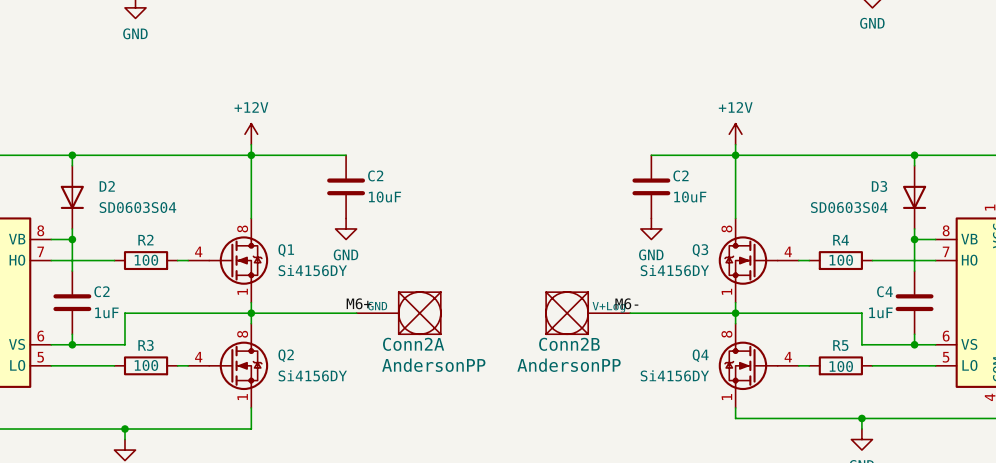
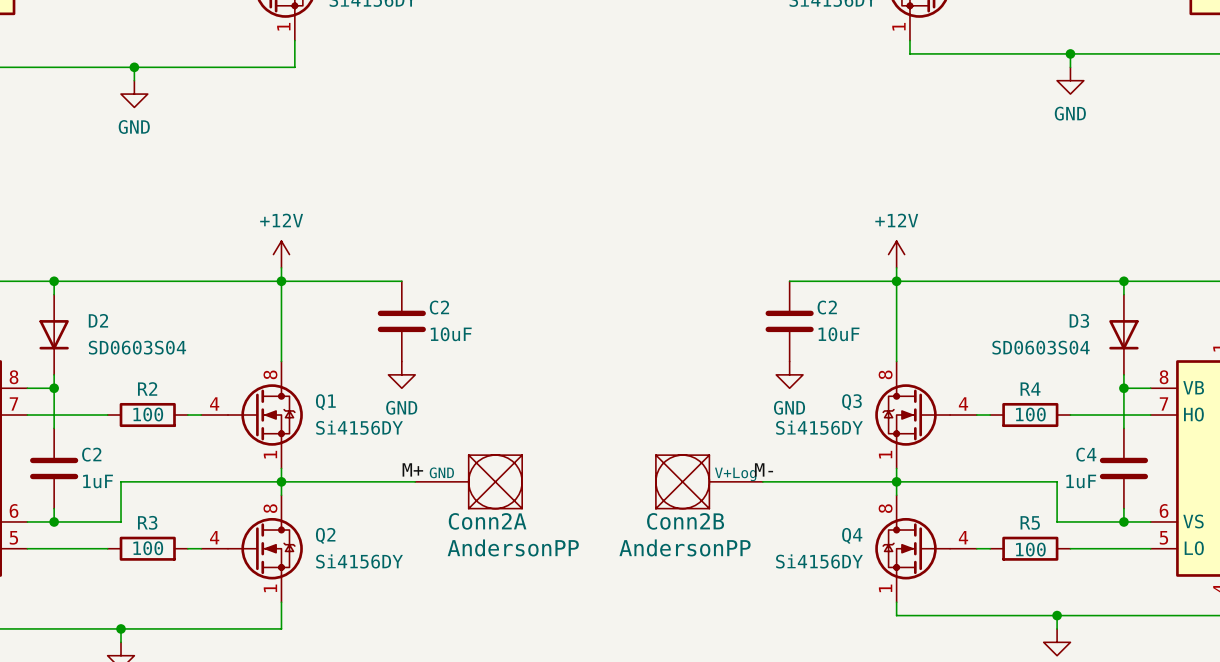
label: M6+ (359, 303) -> M+ (412, 469)
label: M6- (626, 303) -> M- (764, 469)

